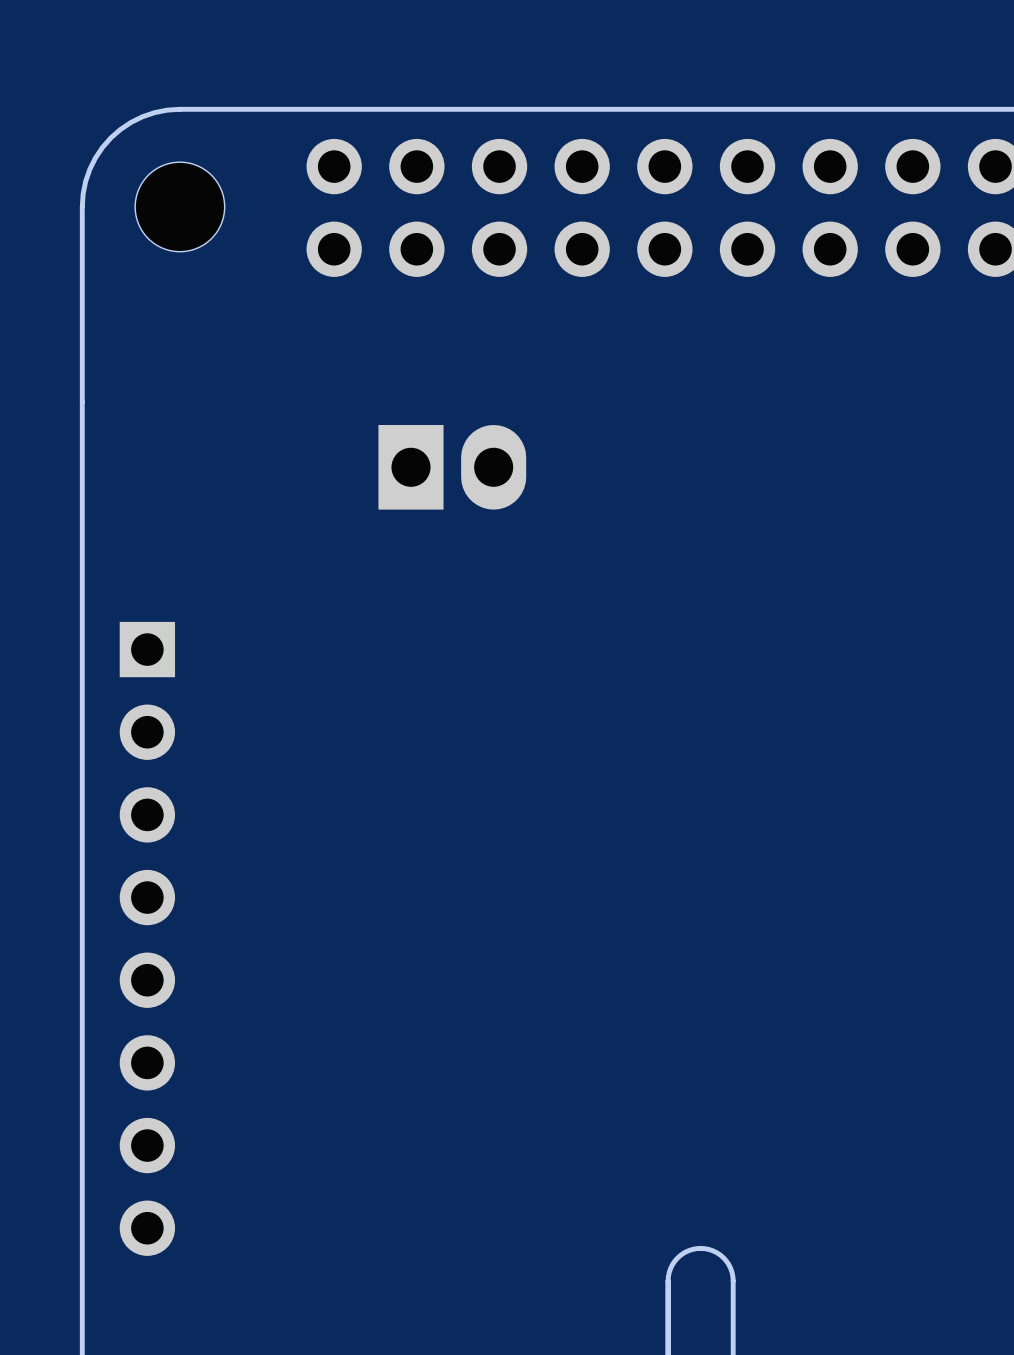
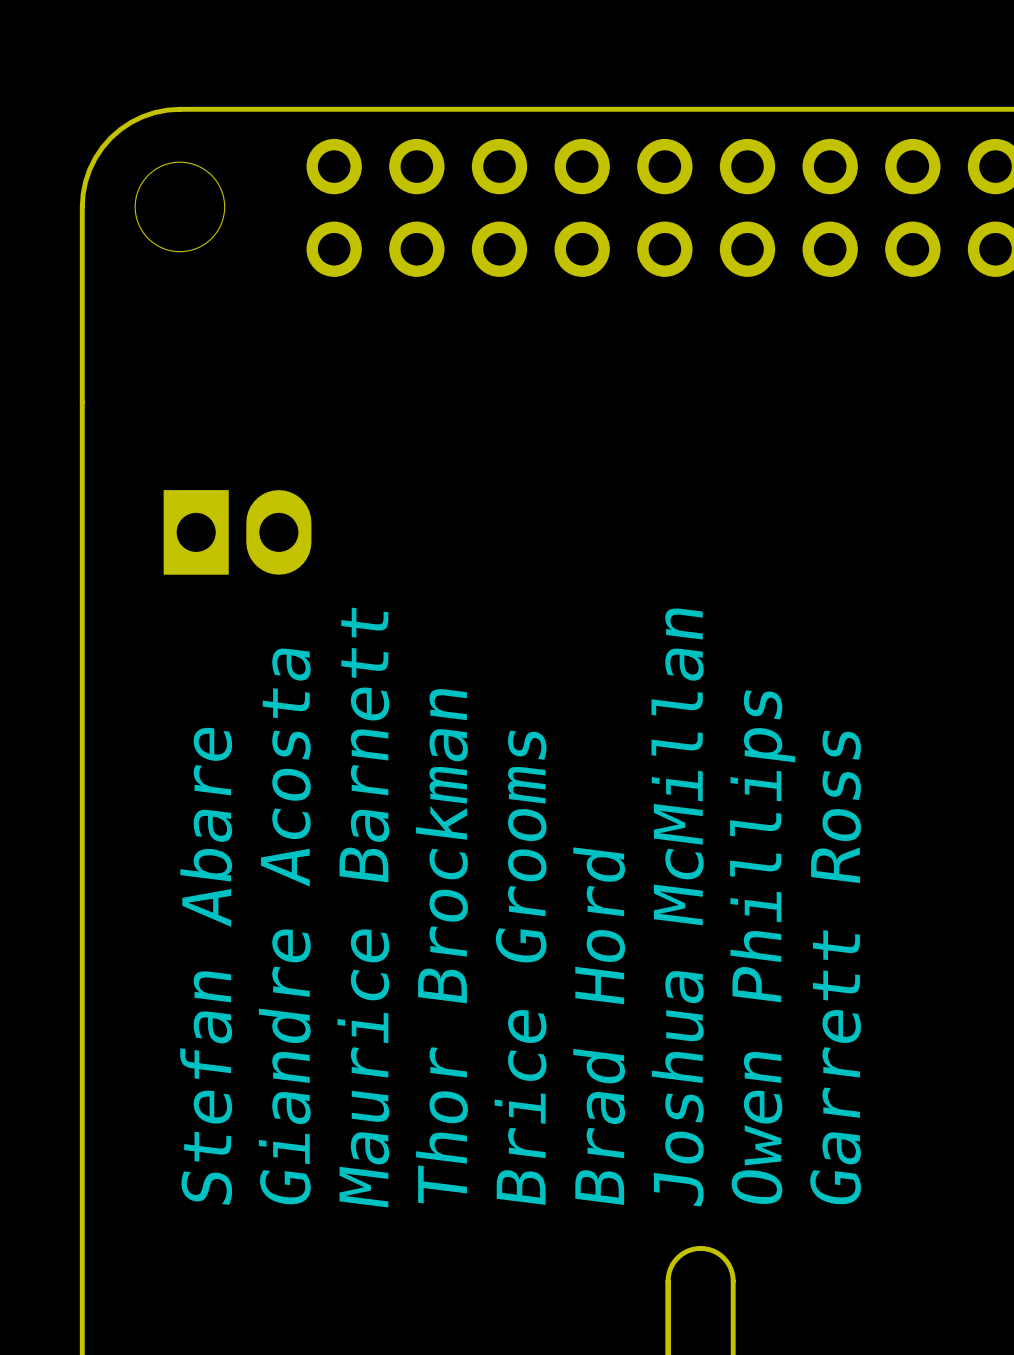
part position: (452, 467) -> (237, 532)
text: none -> Joshua McMillan (677, 907)
text: none -> Maurice Barnett (363, 907)
text: none -> Giandre Acosta (284, 926)
text: none -> Thor Brockman (441, 945)
part: (147, 938) -> none
text: none -> Owen Phillips (762, 947)
text: none -> Brice Grooms (520, 967)
text: none -> Stefan Abare (206, 965)
text: none -> Garrett Ross (835, 968)
text: none -> Brad Hord (599, 1026)

